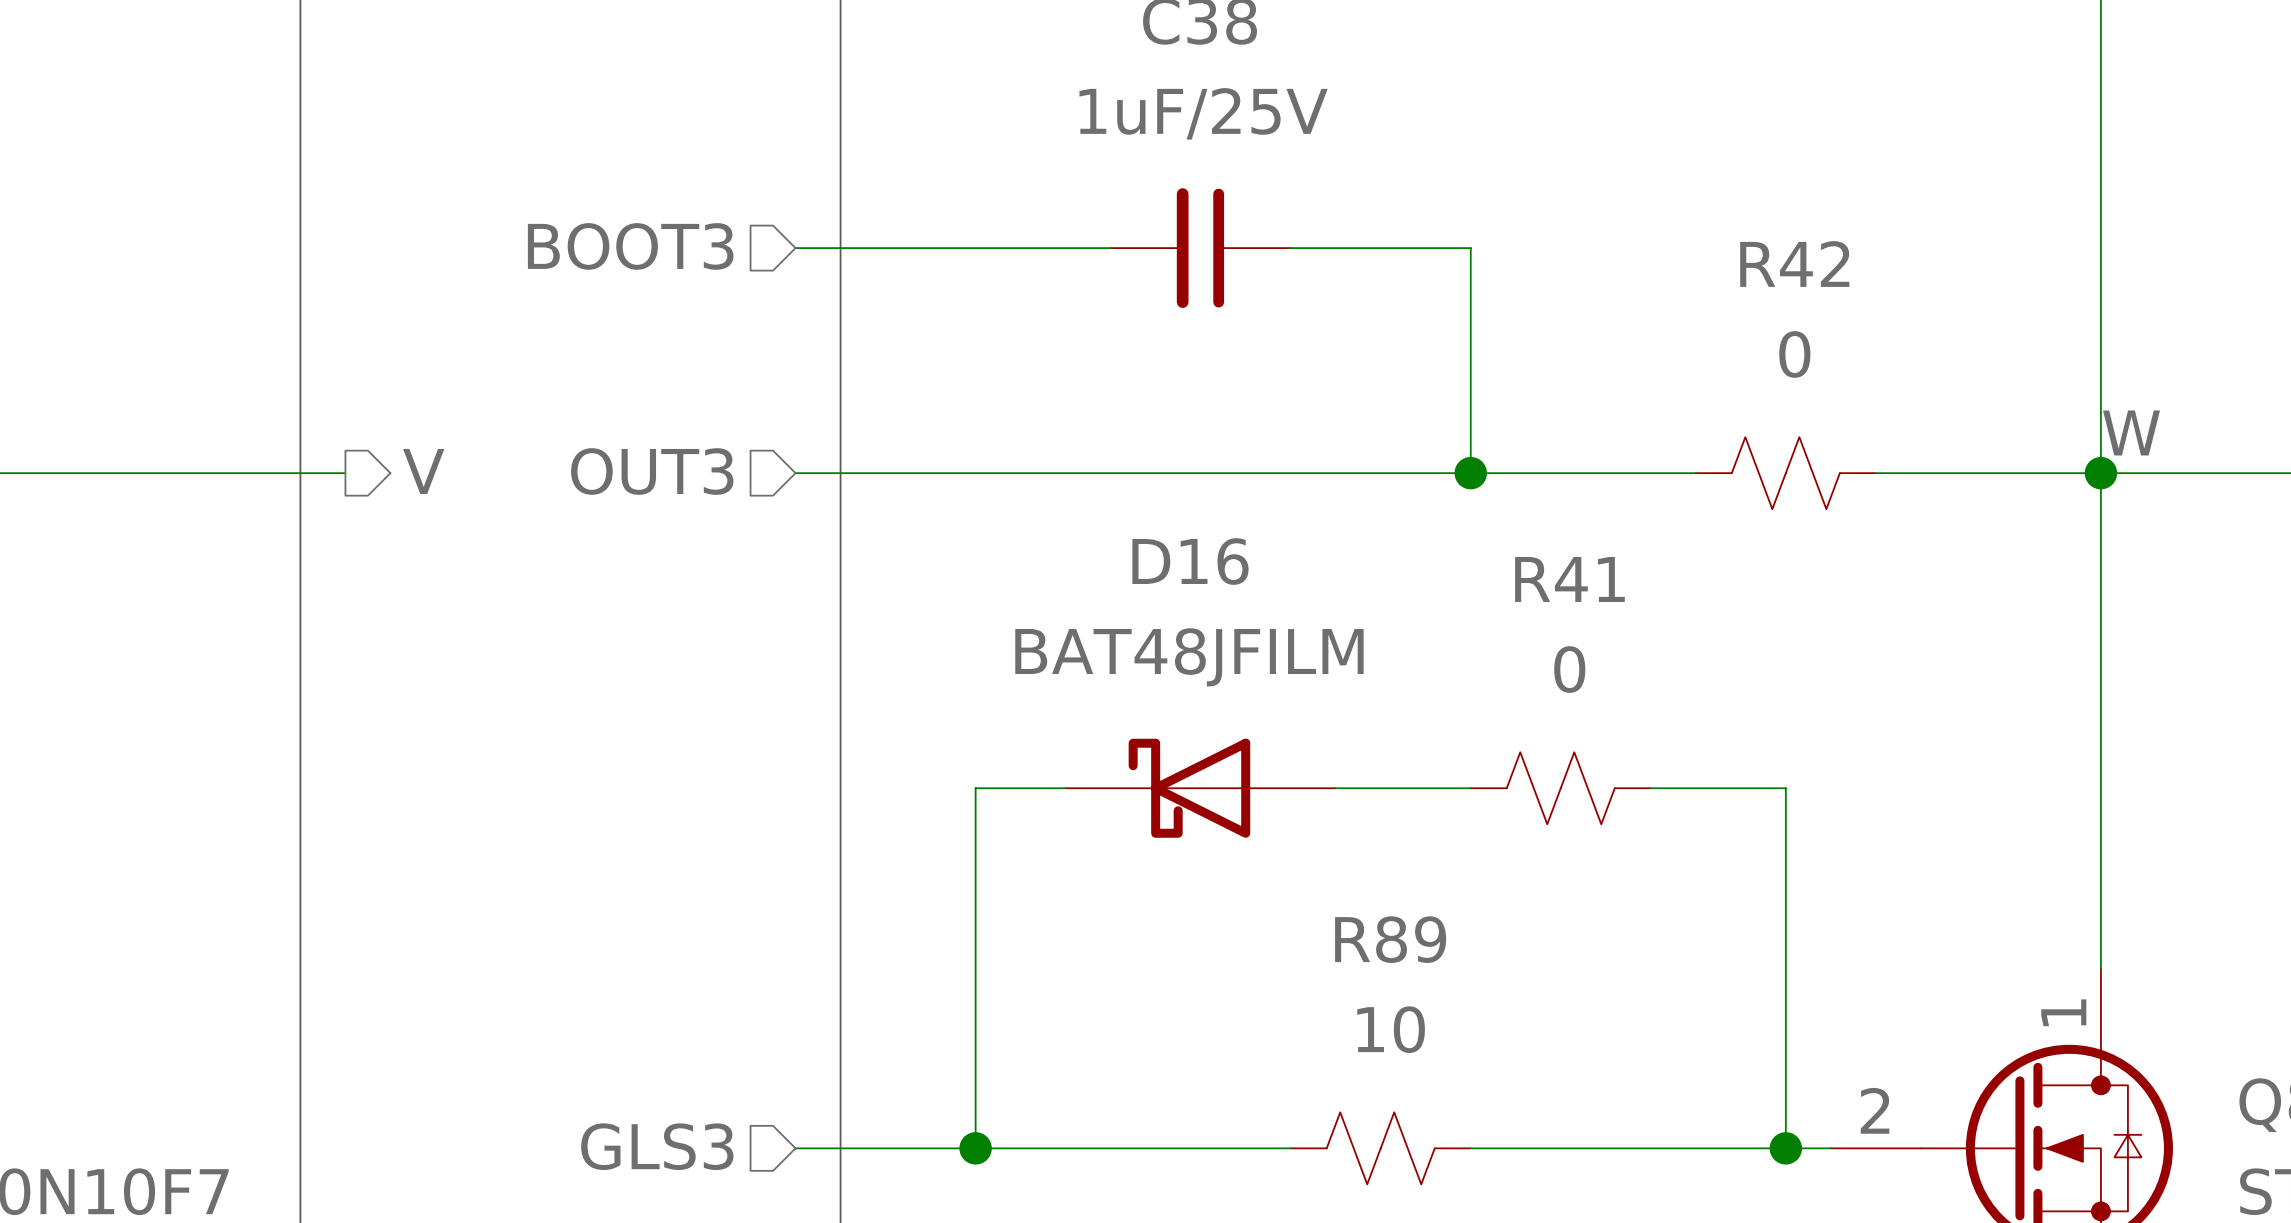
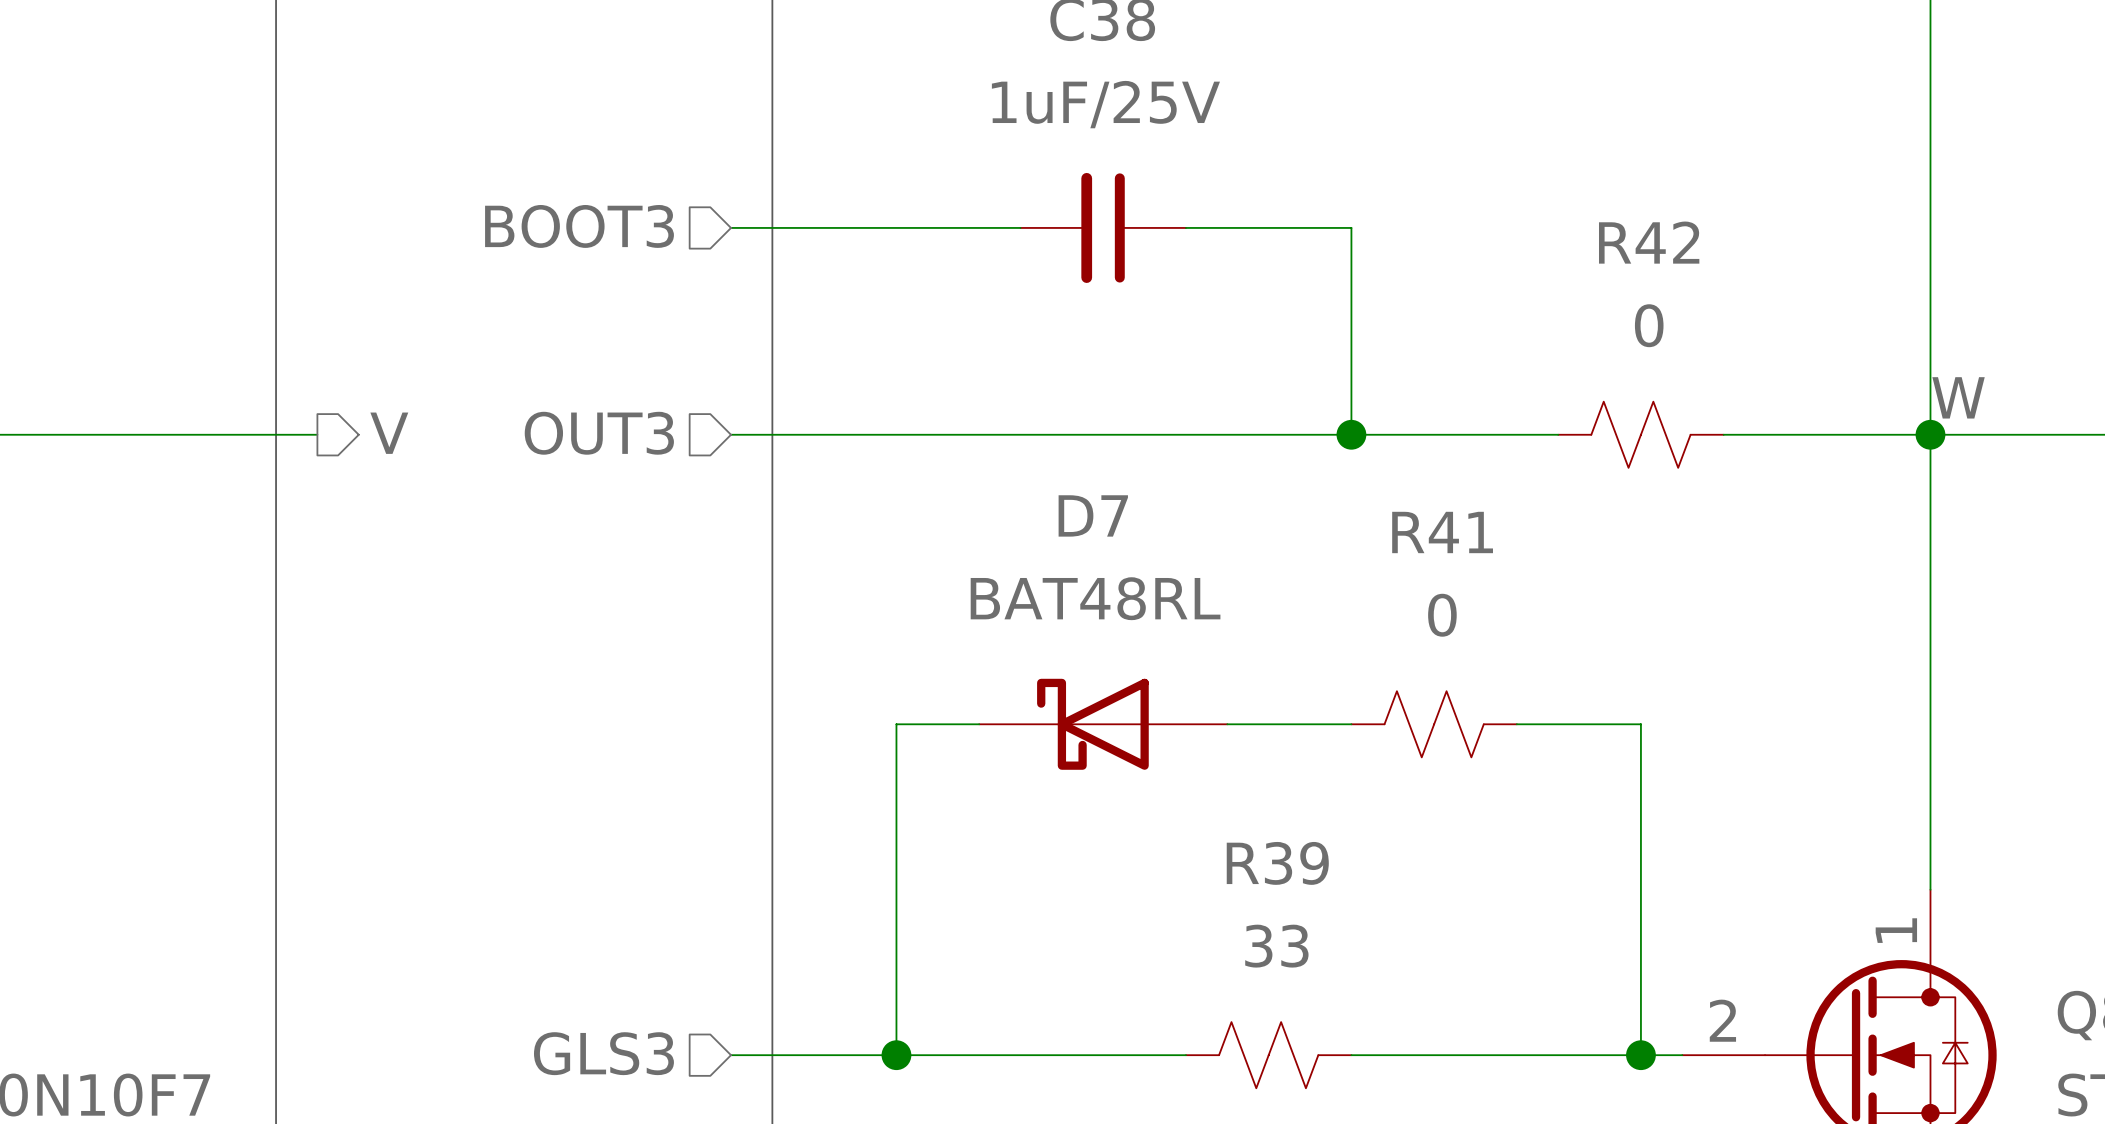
D16 name: D16 (1190, 561) -> D7 (1093, 515)
D16 value: BAT48JFILM (1189, 657) -> BAT48RL (1095, 598)
R89 name: R89 (1390, 939) -> R39 (1277, 863)
R89 value: 10 (1391, 1029) -> 33 (1276, 946)

